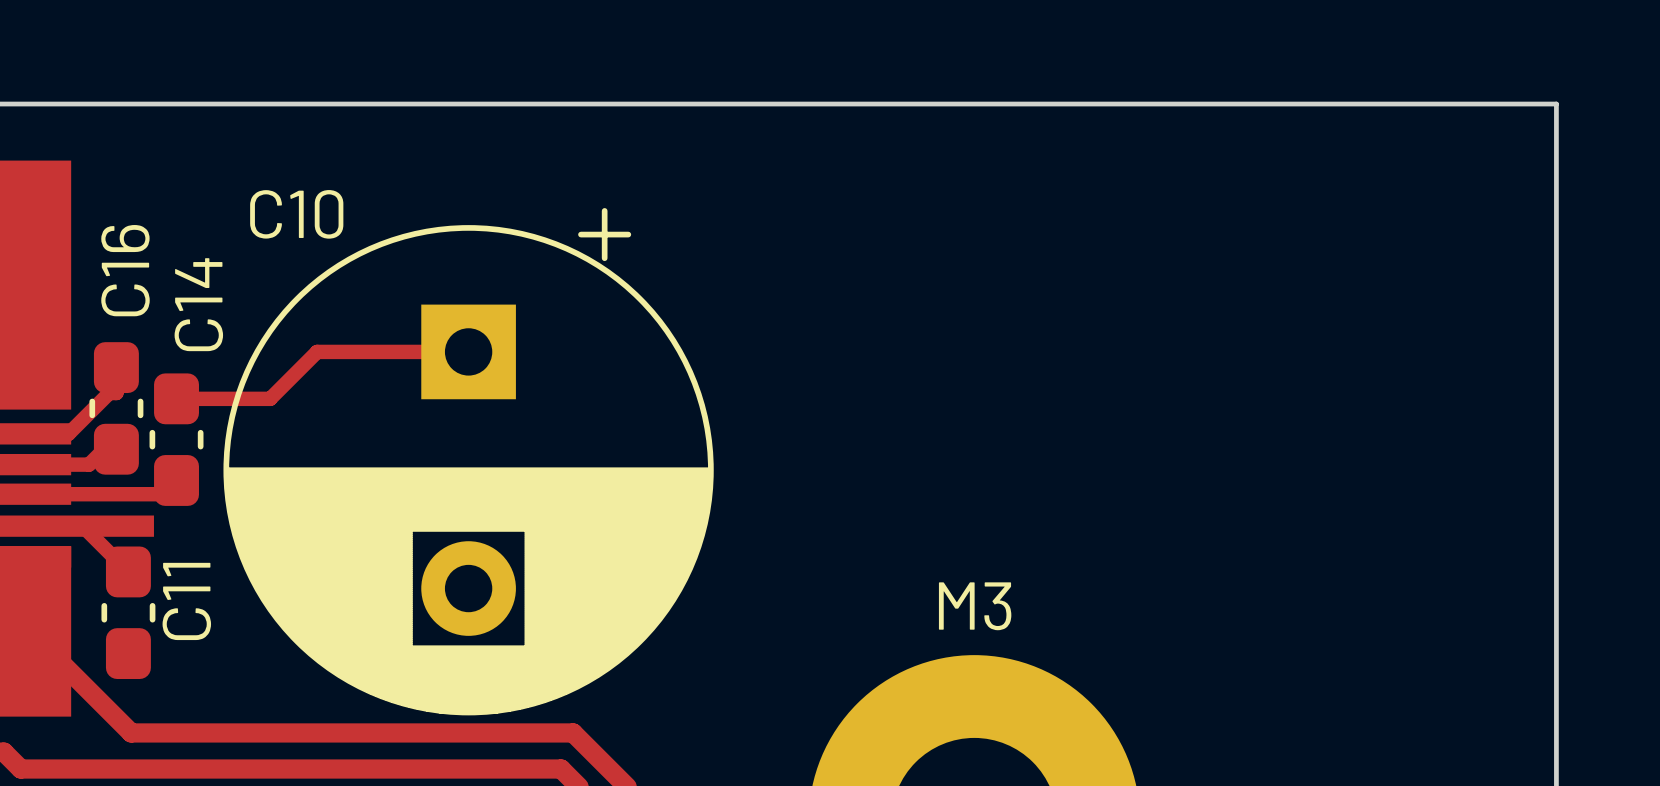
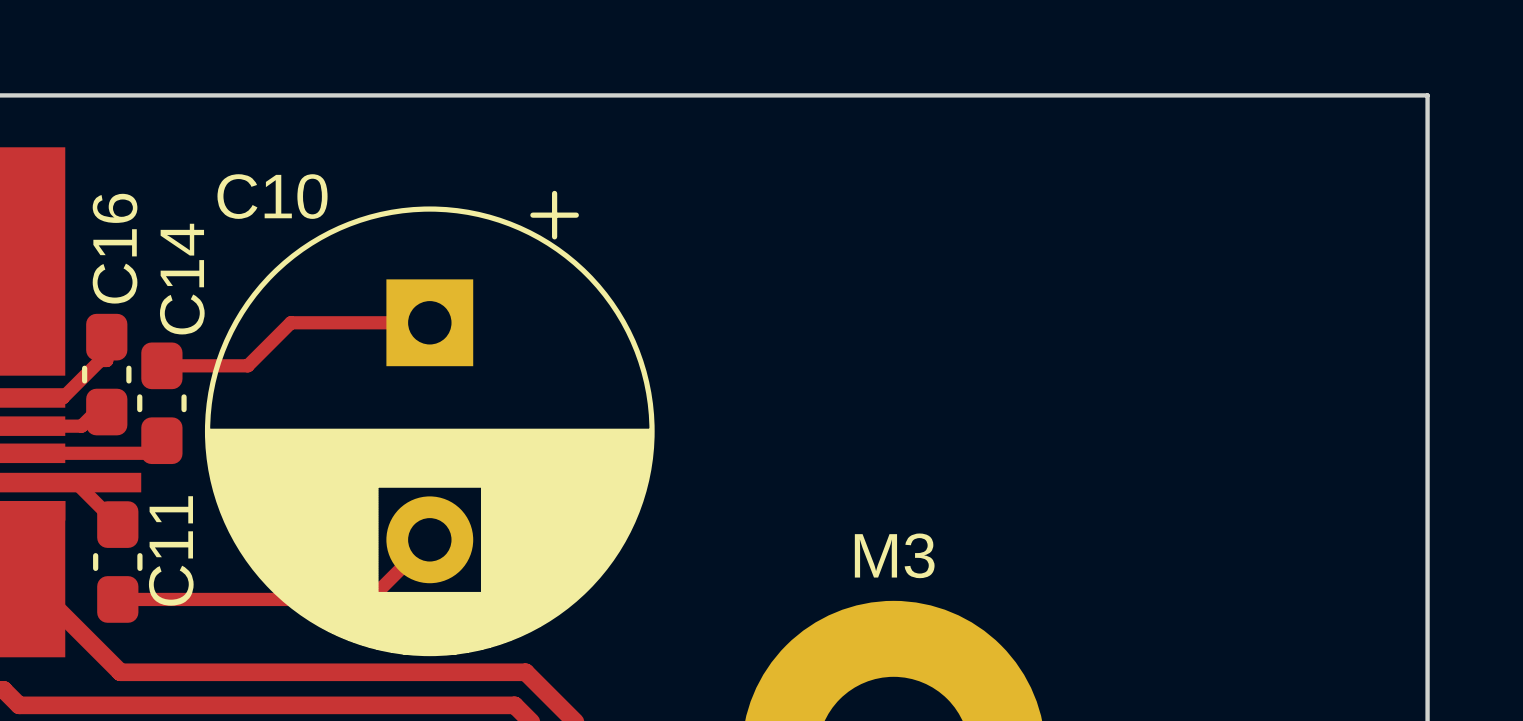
top track: none -> (429, 539) (370, 599) (117, 599)

